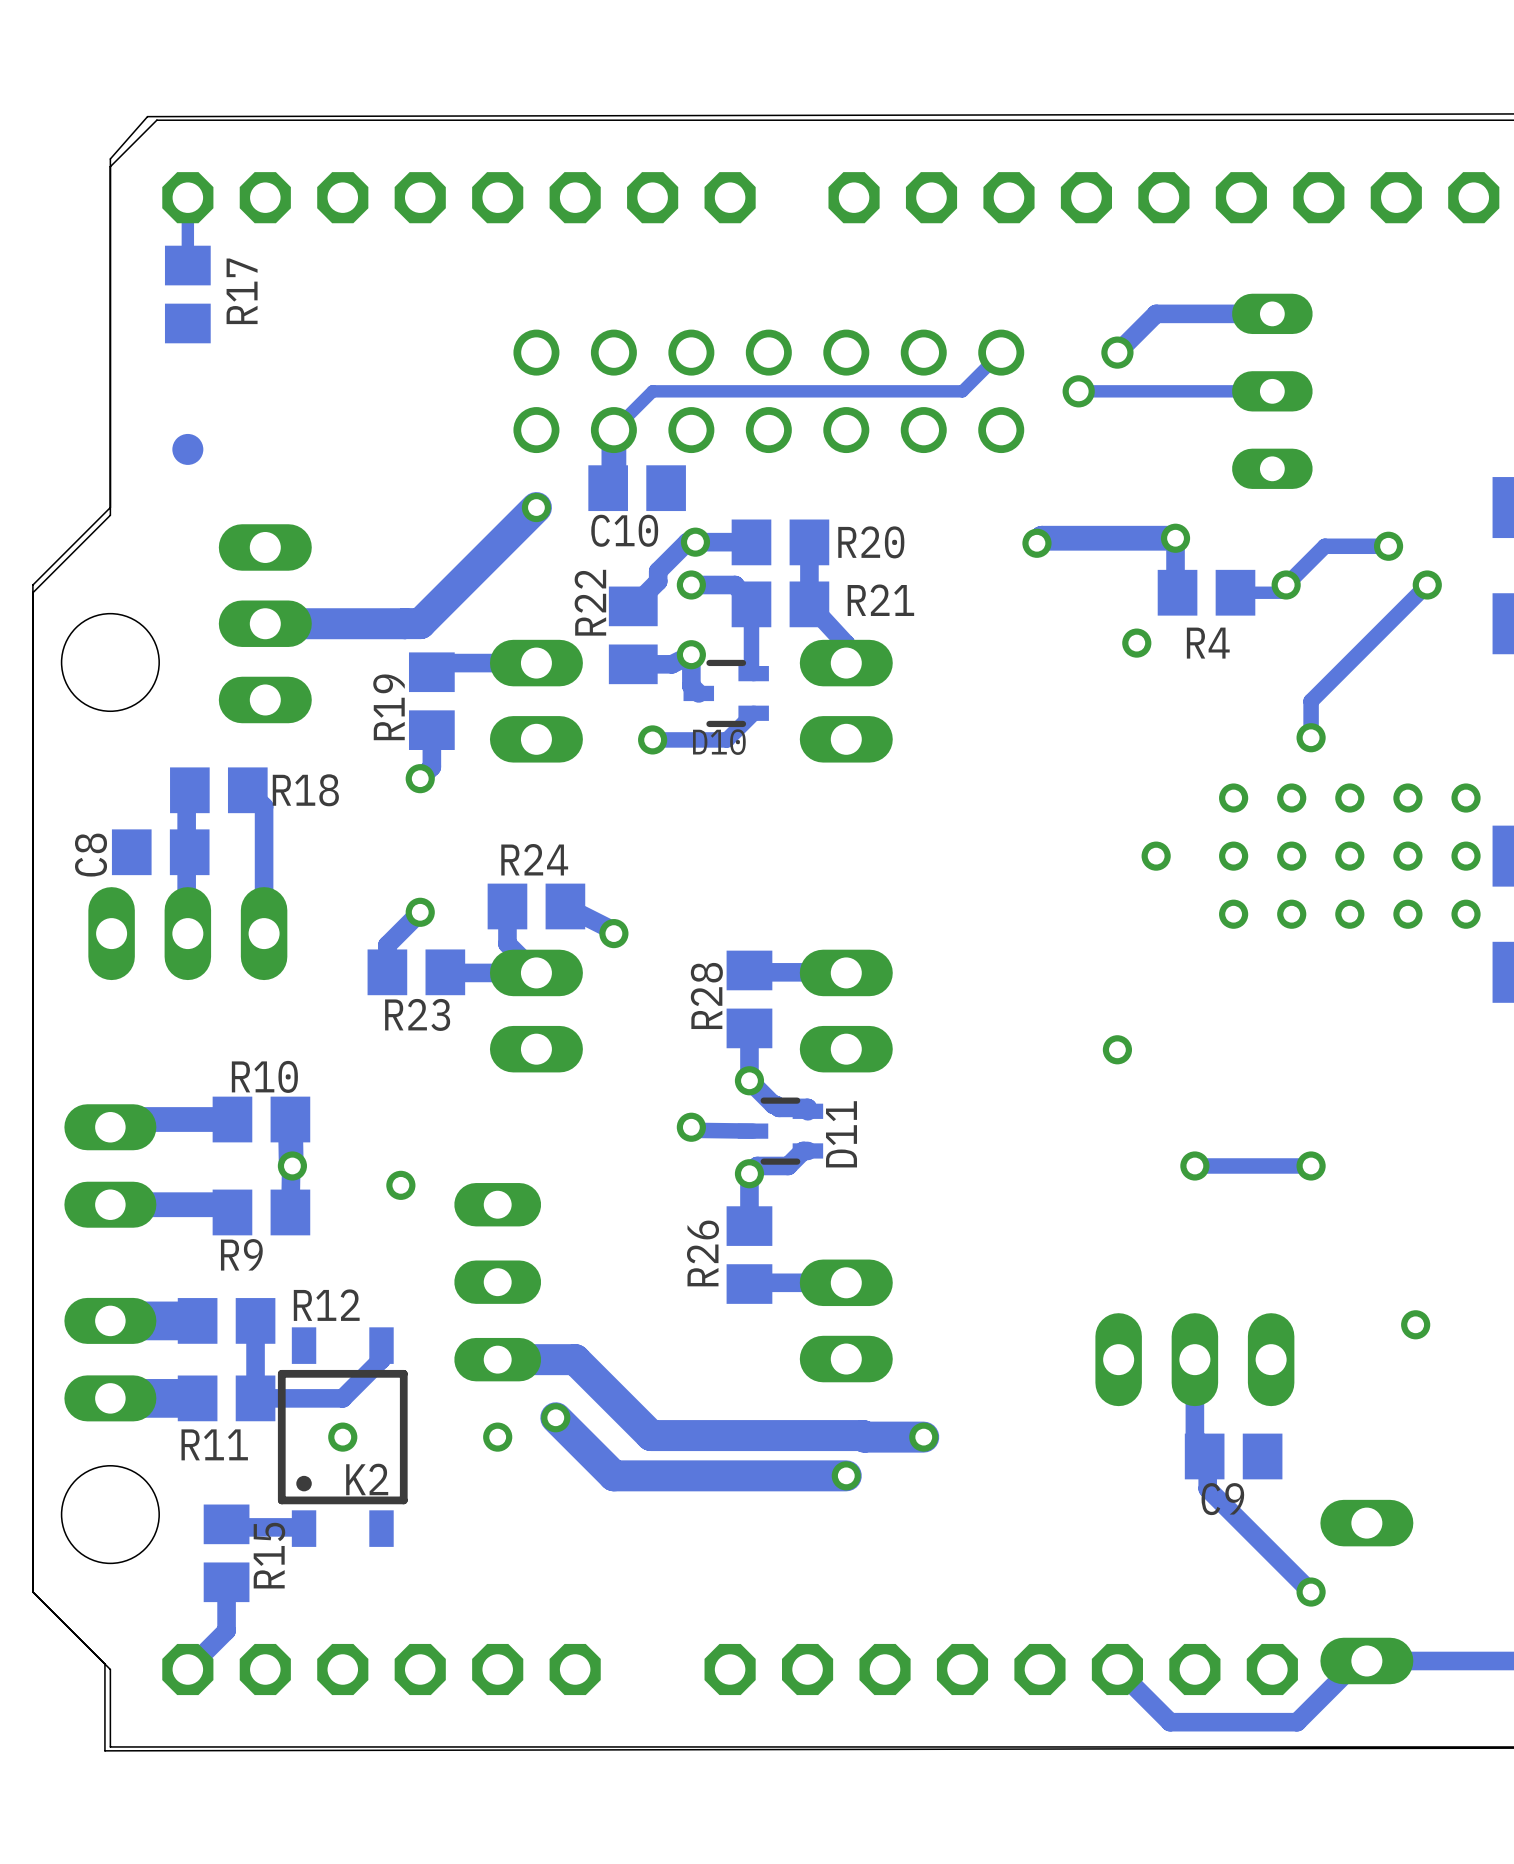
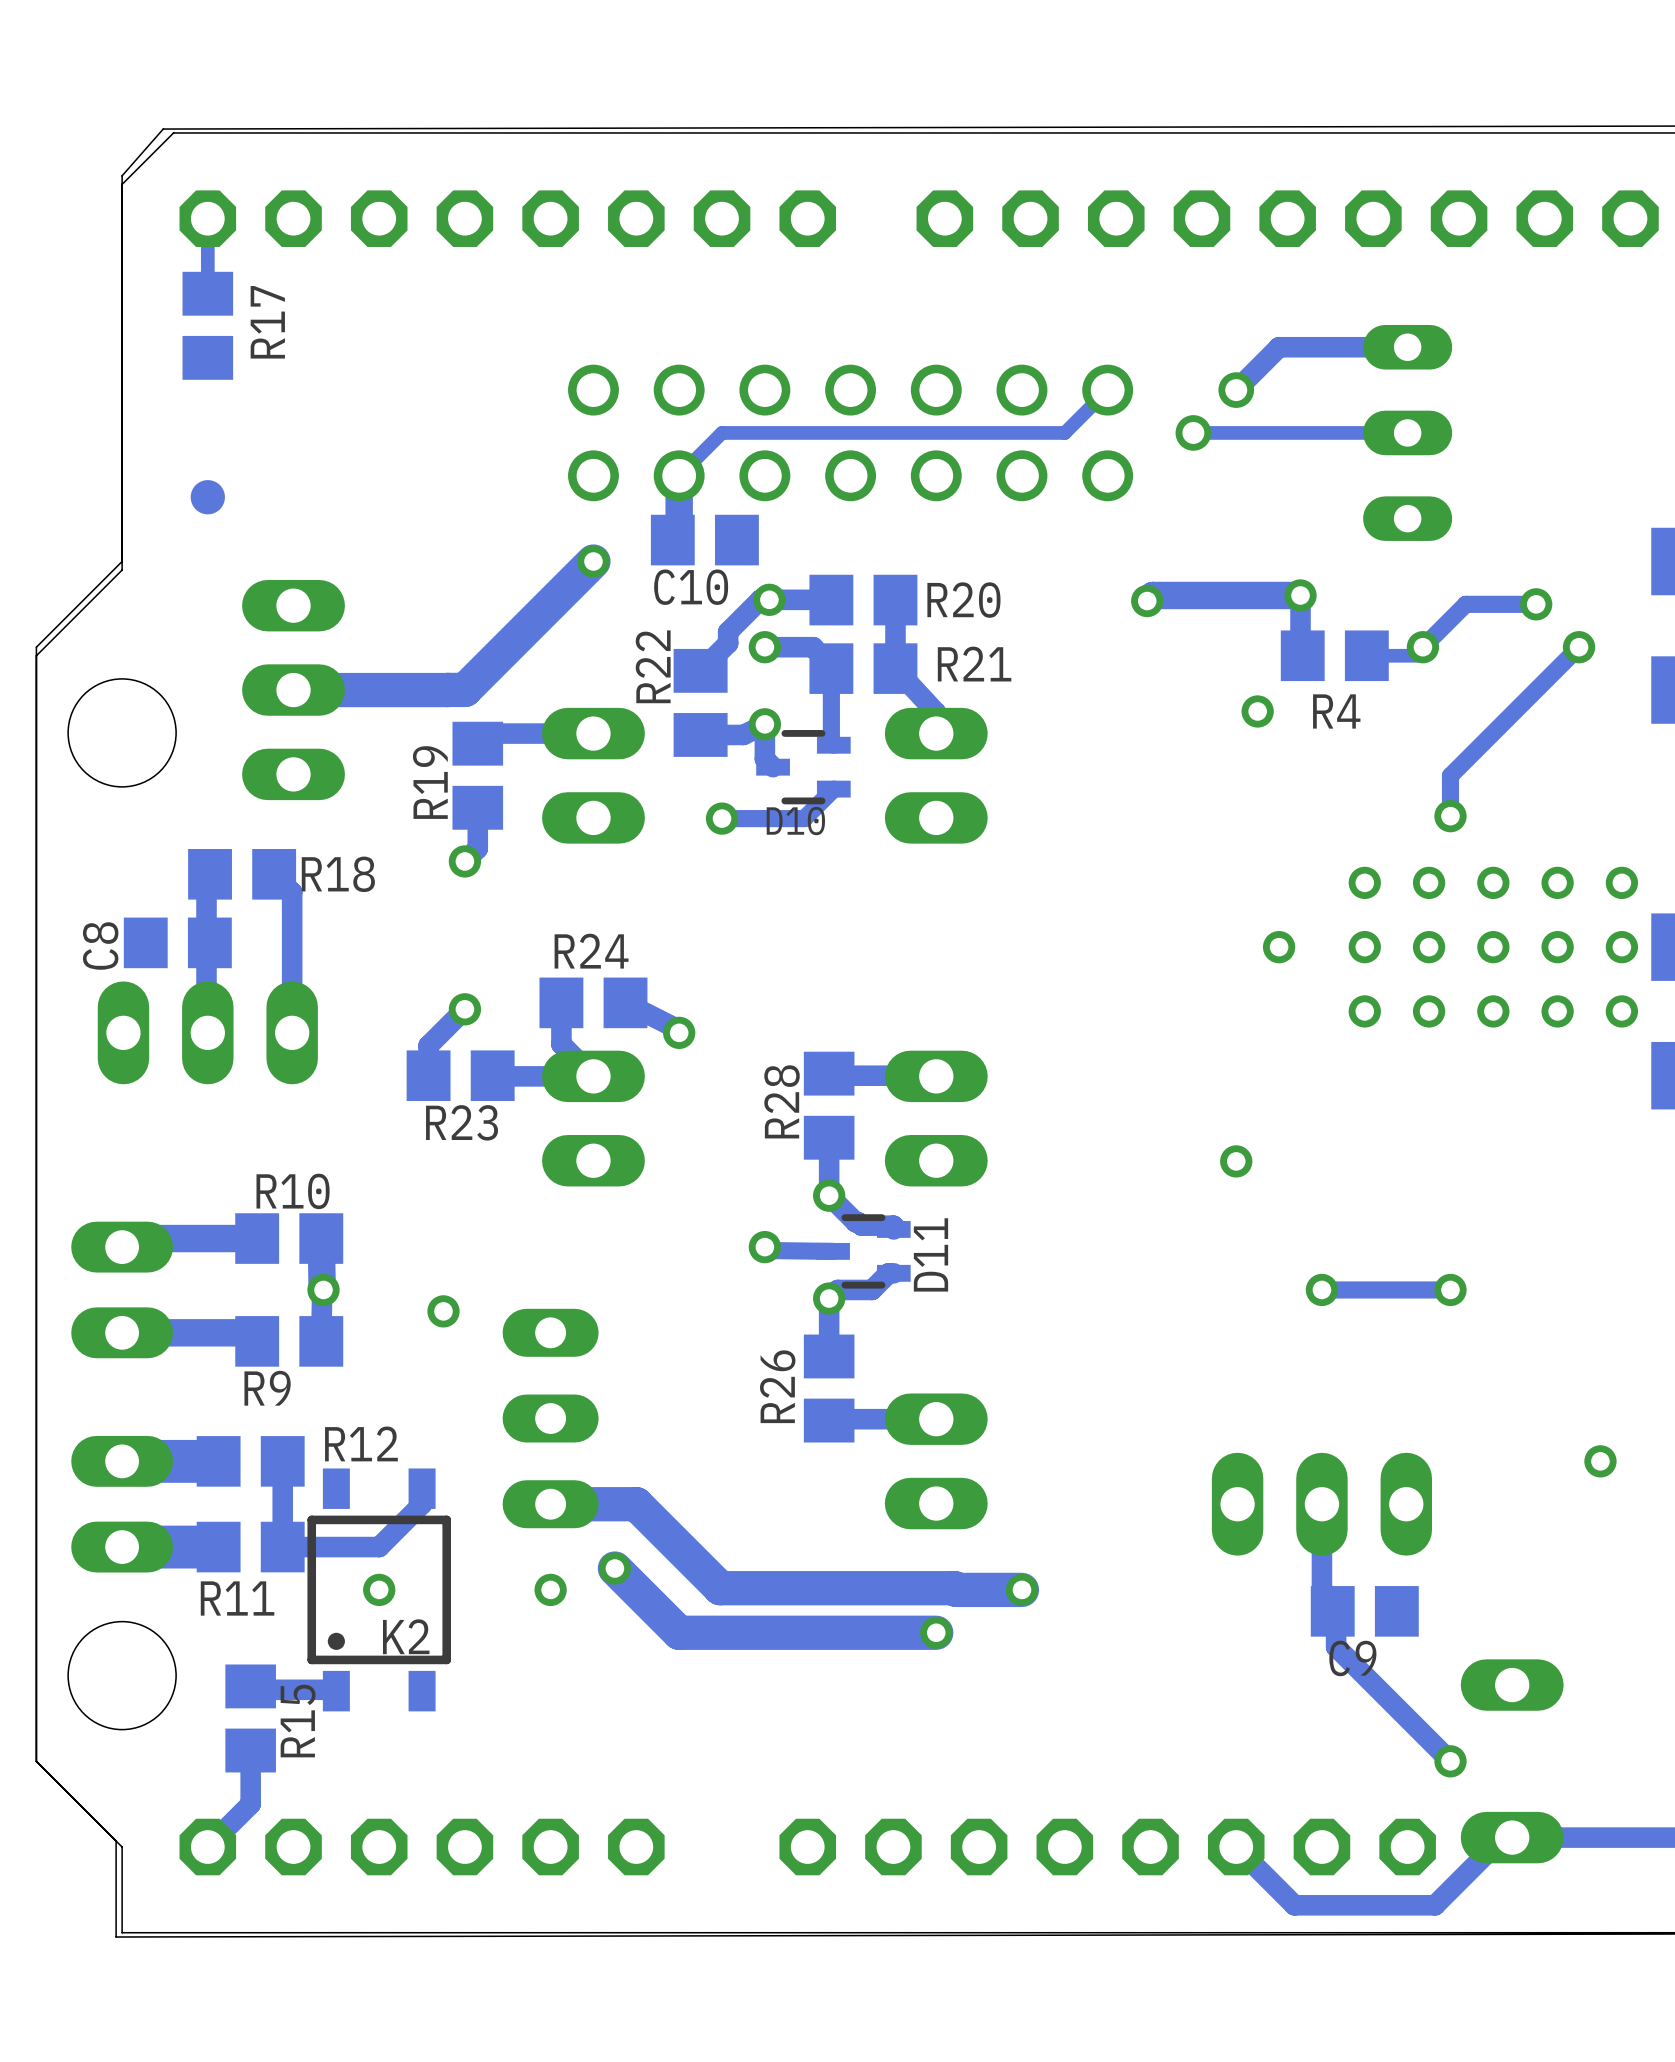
via position: (1415, 1324) -> (1600, 1461)

